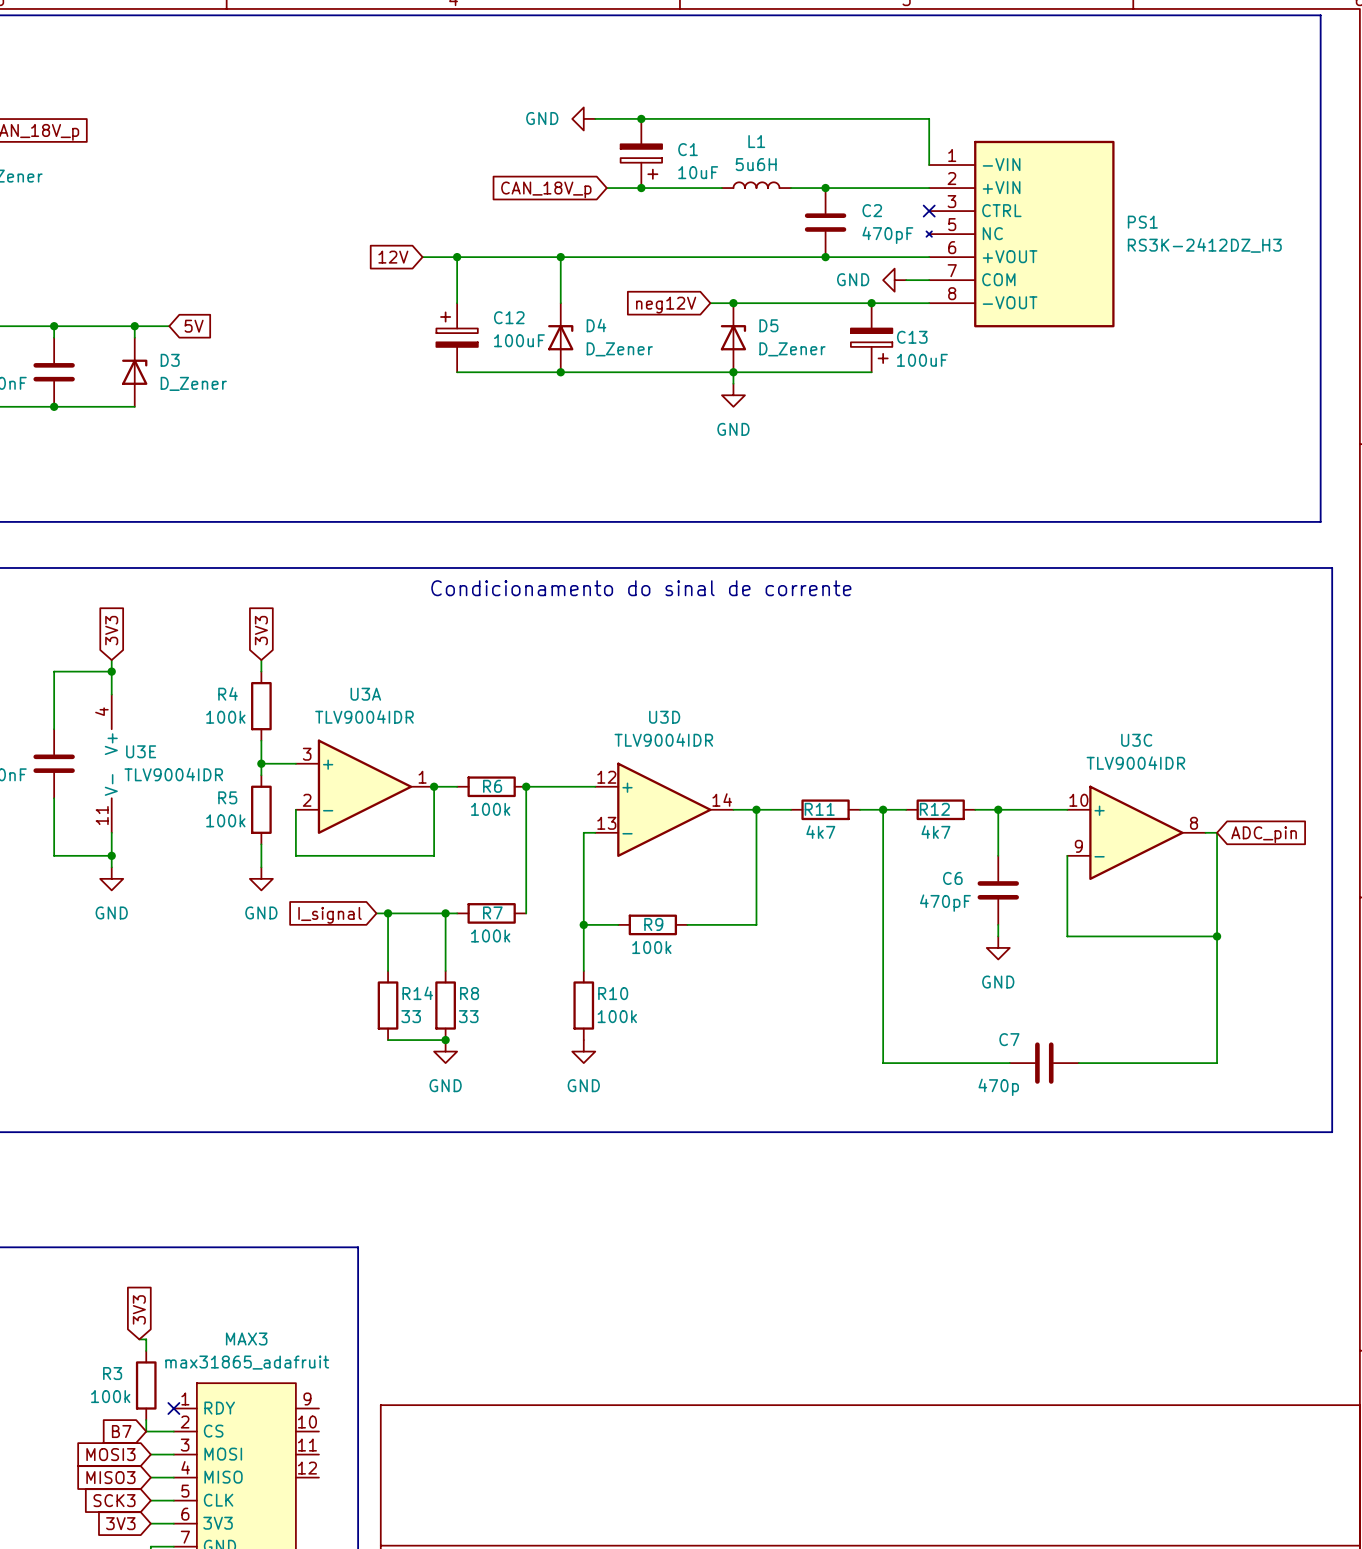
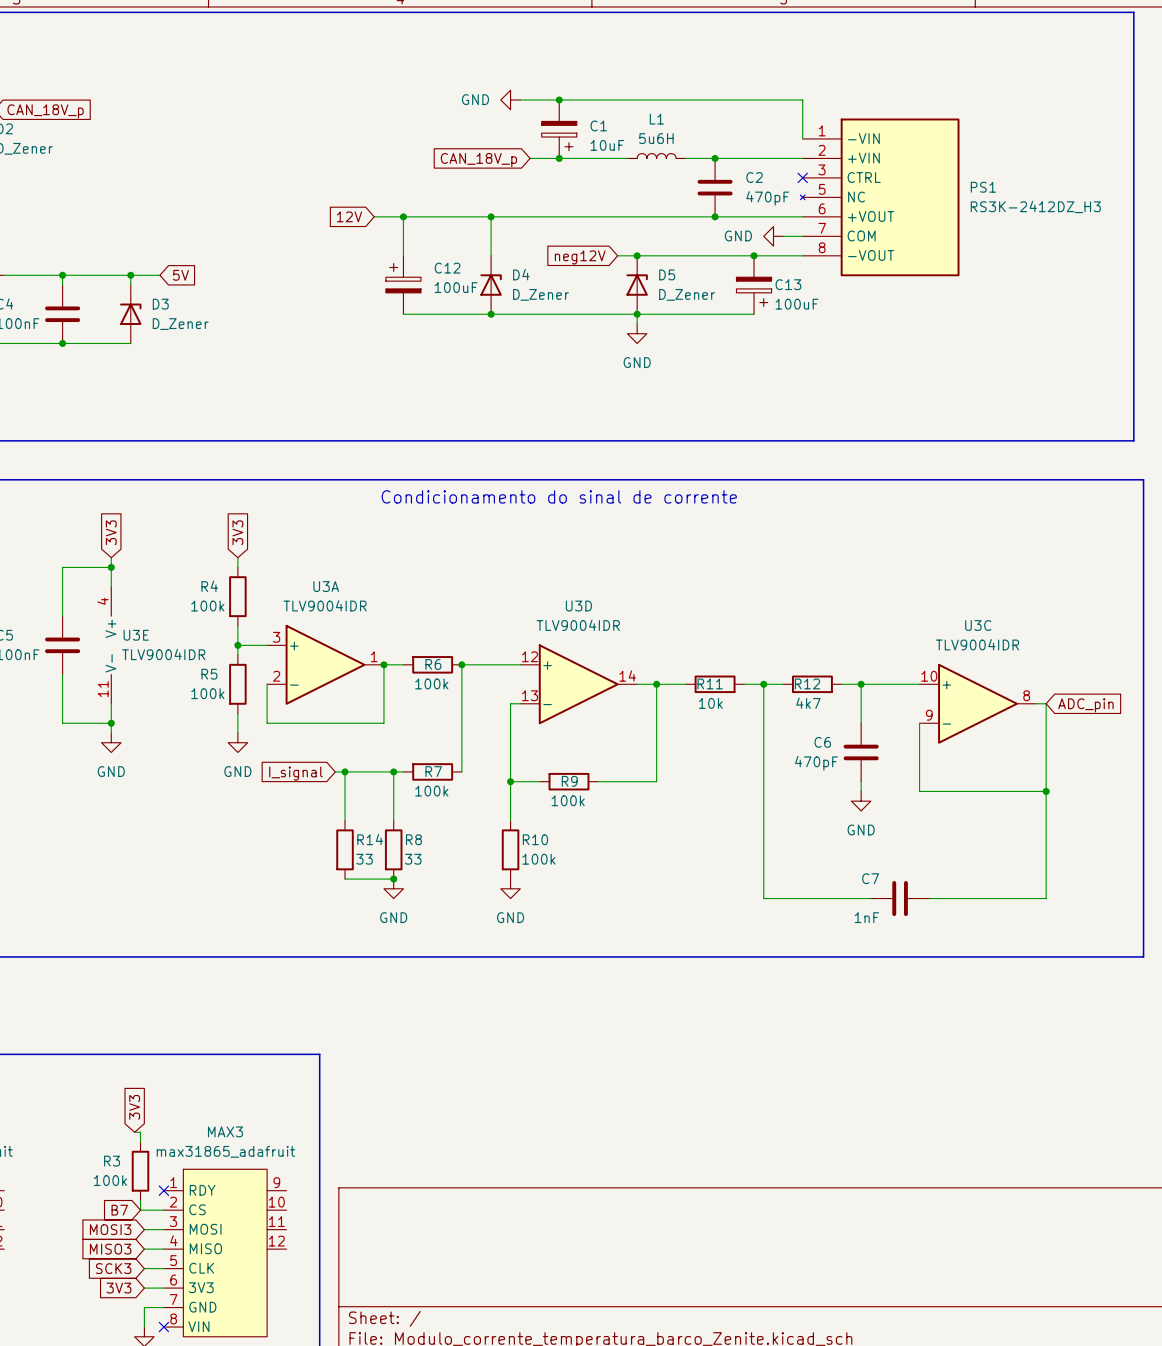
R11 value: 4k7 (820, 832) -> 10k (710, 703)
C7 value: 470p (998, 1087) -> 1nF (866, 917)

